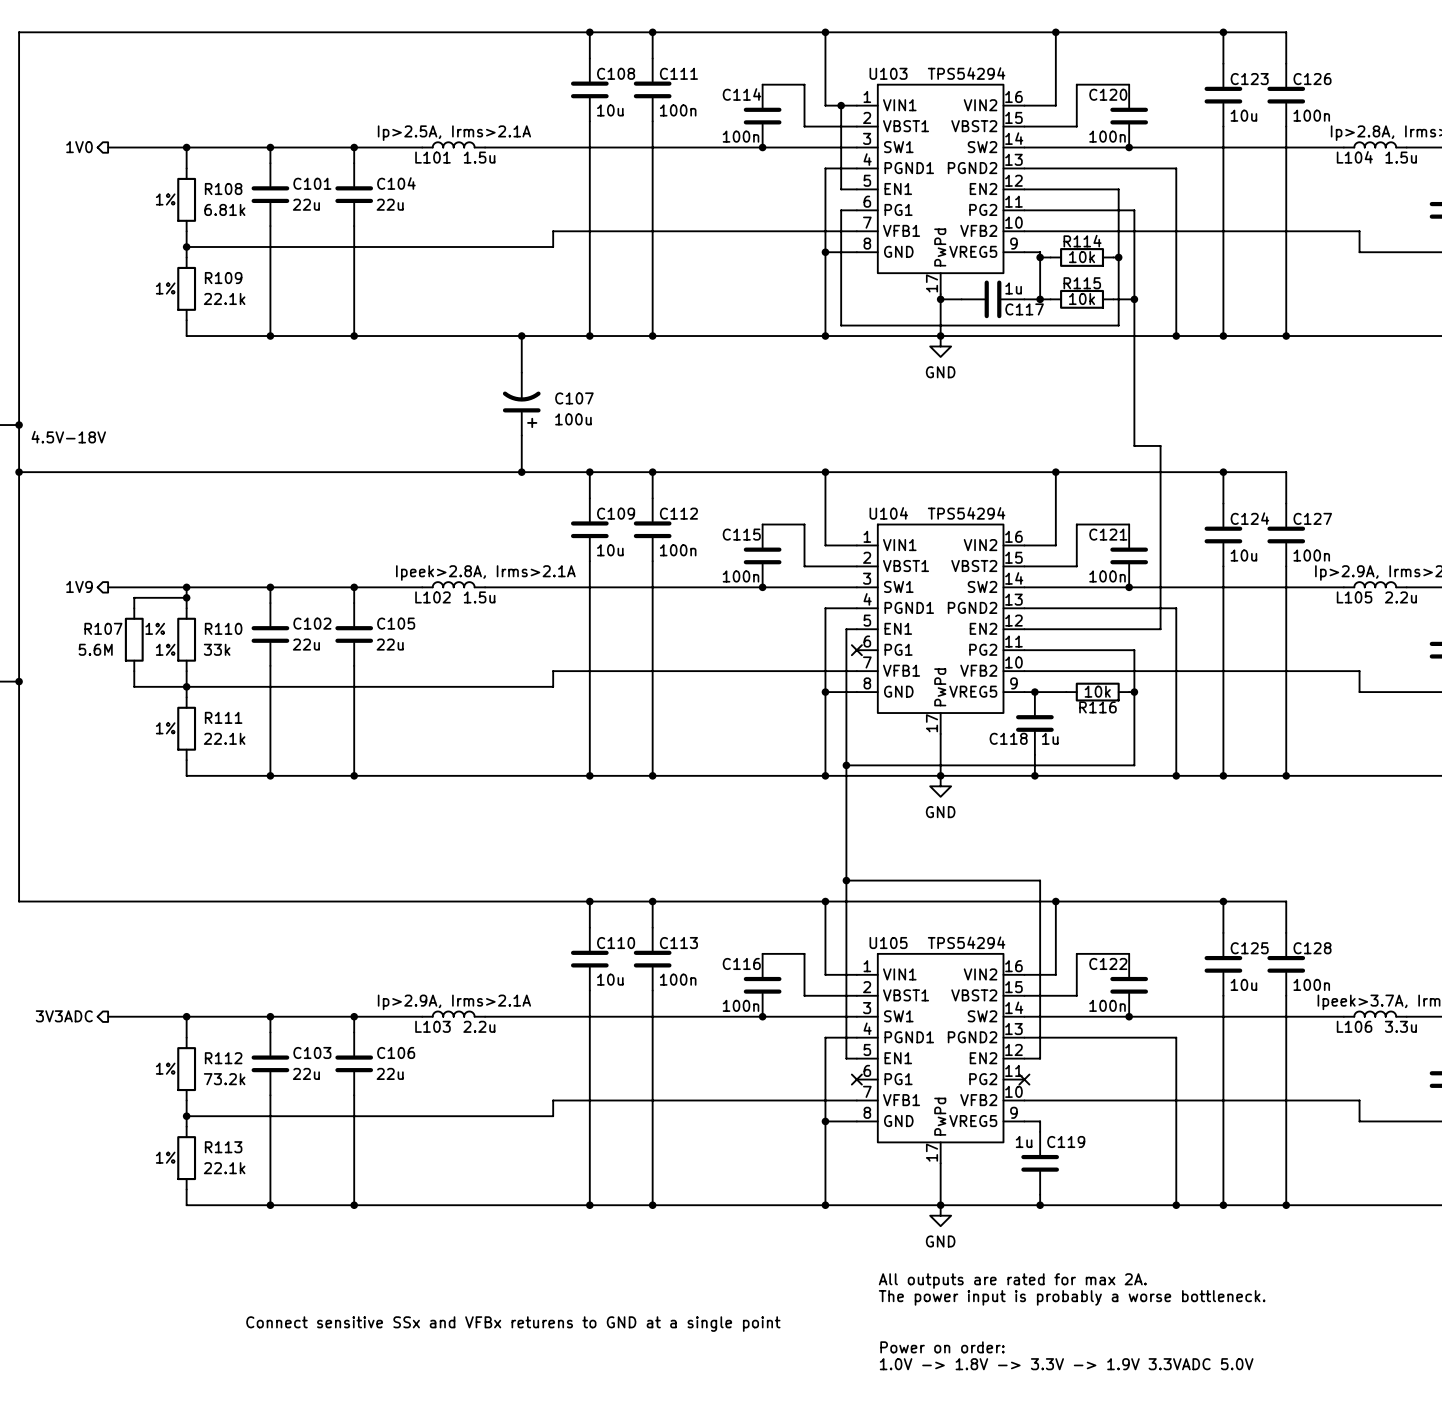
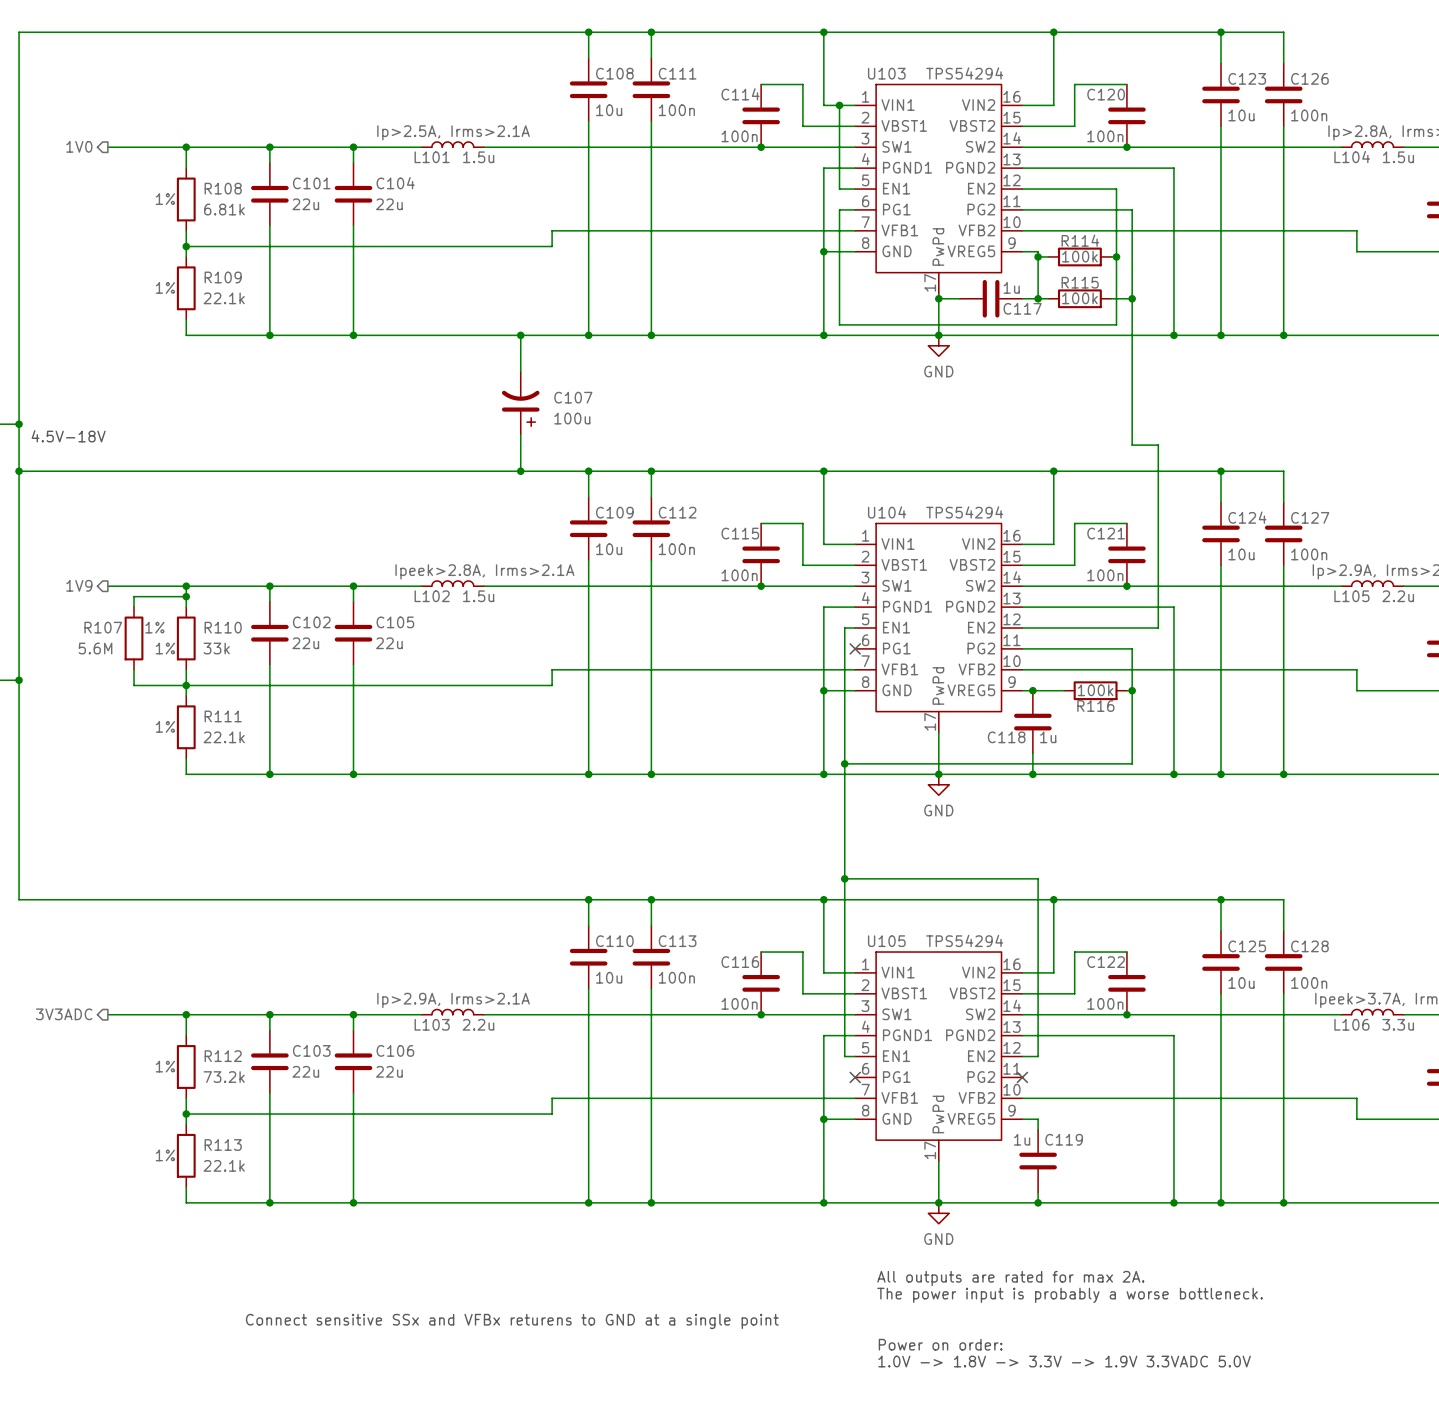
R114 value: 10k (1082, 257) -> 100k (1079, 256)
R115 value: 10k (1082, 298) -> 100k (1079, 298)
R116 value: 10k (1097, 691) -> 100k (1095, 690)

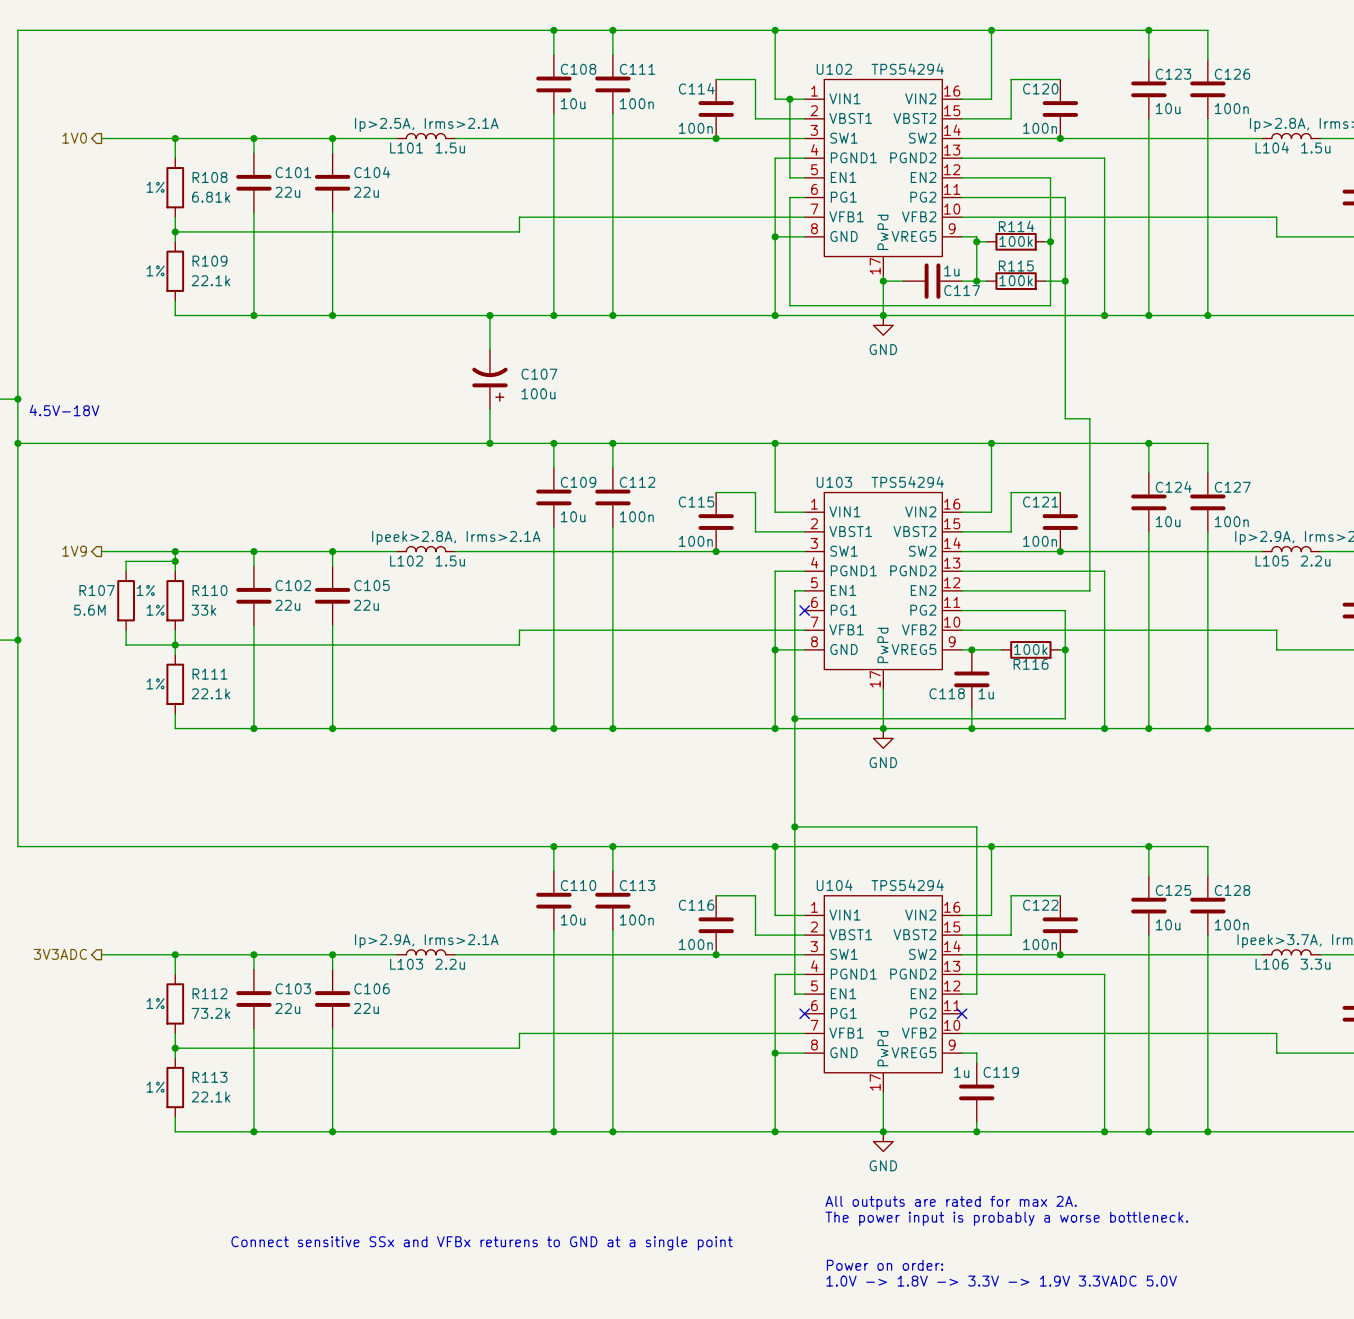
U103 name: U103 (886, 73) -> U102 (834, 69)
U104 name: U104 (887, 512) -> U103 (834, 482)
U105 name: U105 (886, 941) -> U104 (834, 885)

